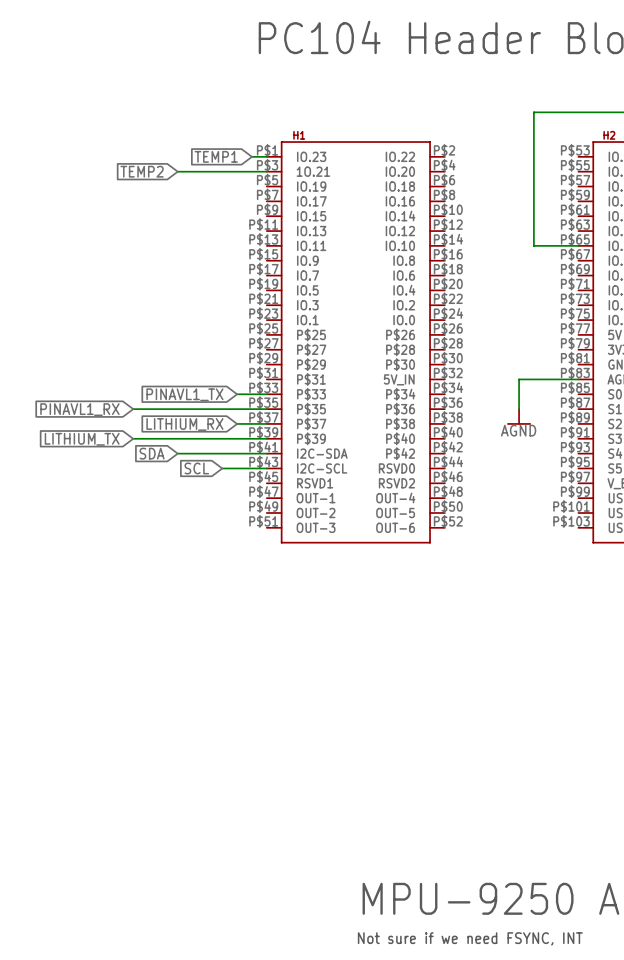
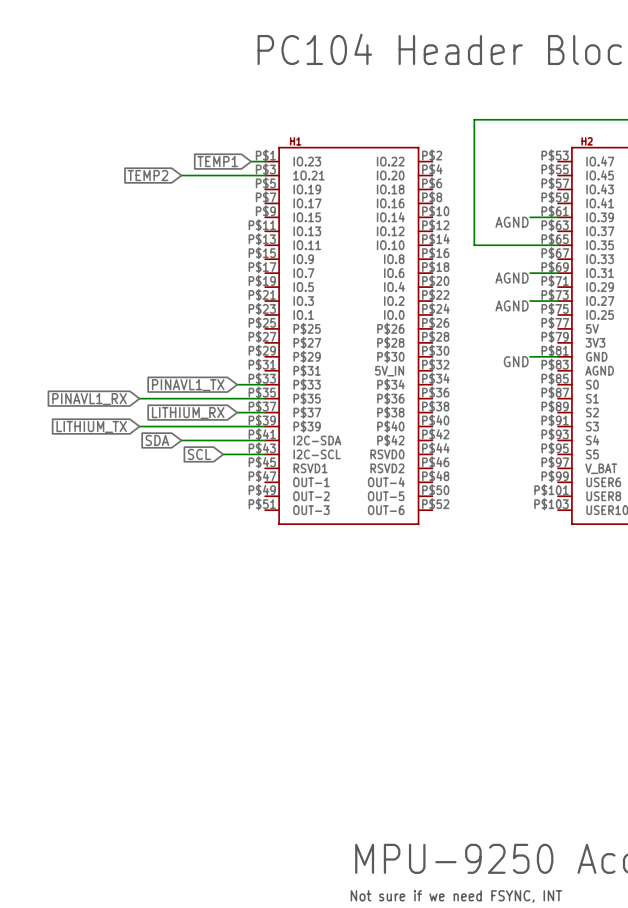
wire: (533, 112) (533, 245) -> (516, 119) (474, 119) (474, 245) (516, 245)
wire: none -> (530, 217) (557, 217)
label: none -> AGND (512, 222)
wire: none -> (530, 273) (557, 273)
label: none -> AGND (512, 278)
wire: none -> (530, 301) (557, 301)
label: none -> AGND (512, 305)
wire: none -> (530, 356) (557, 356)
label: none -> GND (516, 361)
wire: (578, 379) (519, 379) (519, 409) -> none
power symbol: AGND (519, 416) -> none

